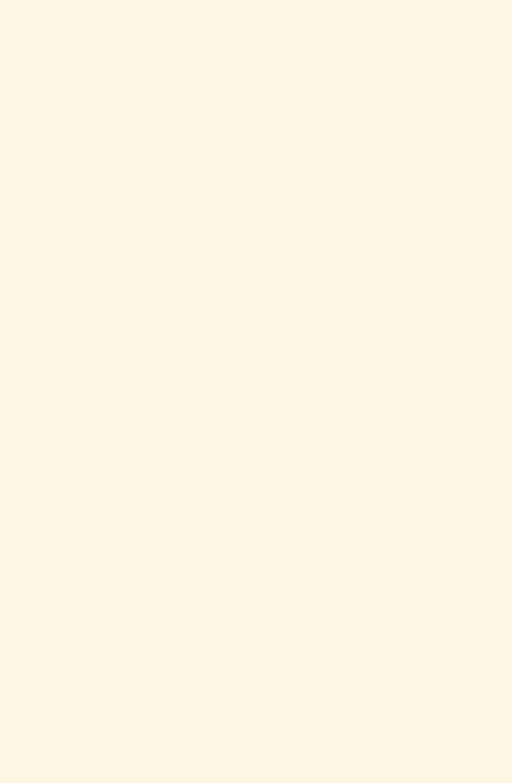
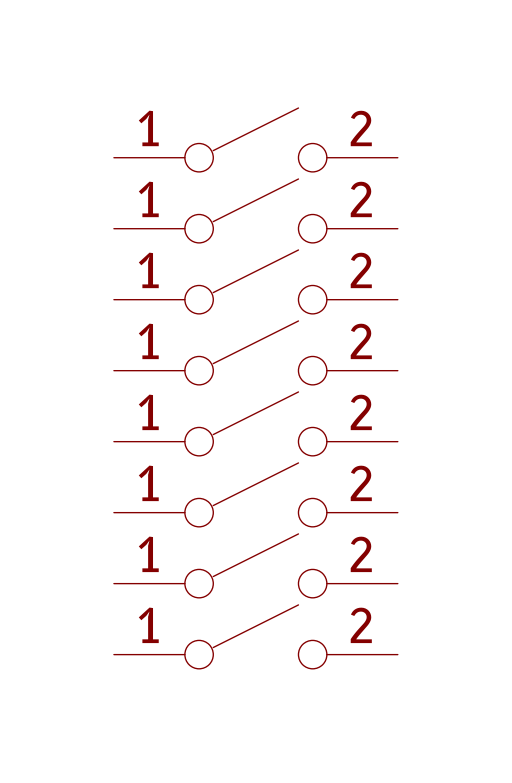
part: none -> (255, 139)
part: none -> (255, 210)
part: none -> (255, 281)
part: none -> (255, 352)
part: none -> (255, 423)
part: none -> (255, 494)
part: none -> (255, 565)
part: none -> (255, 636)

